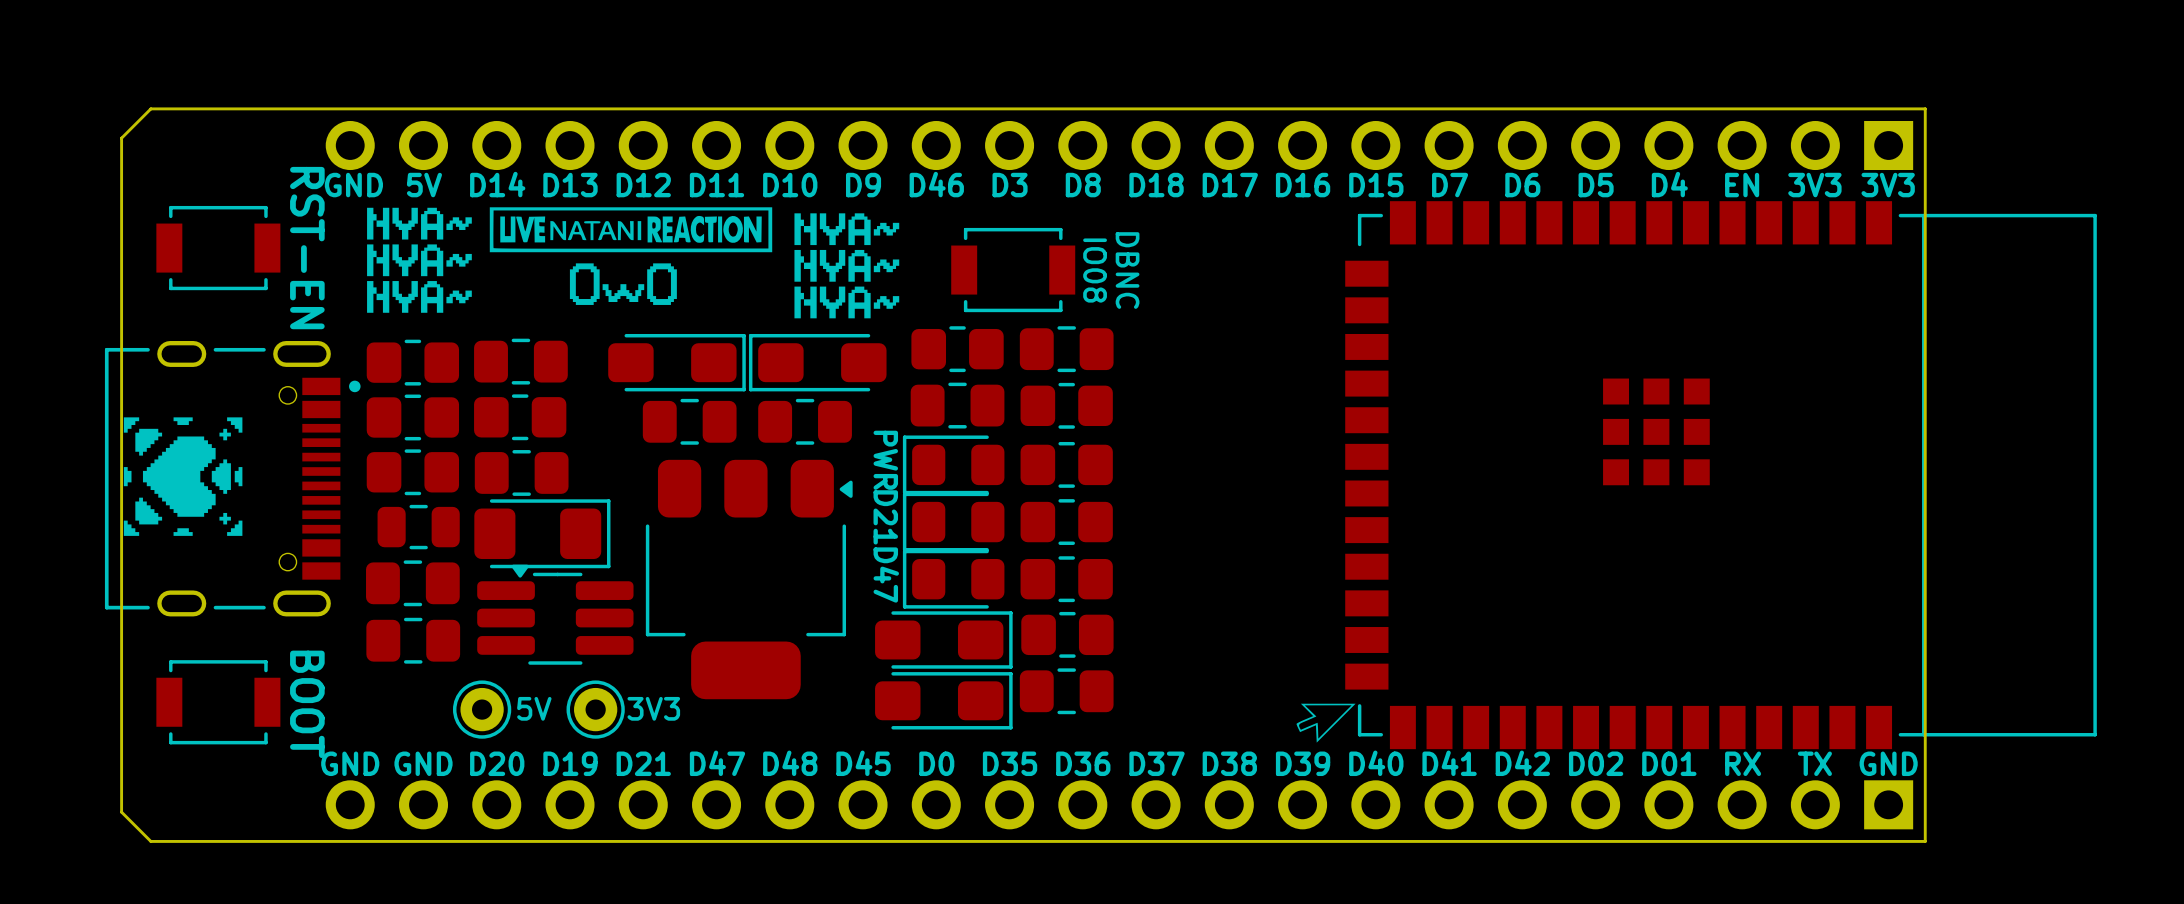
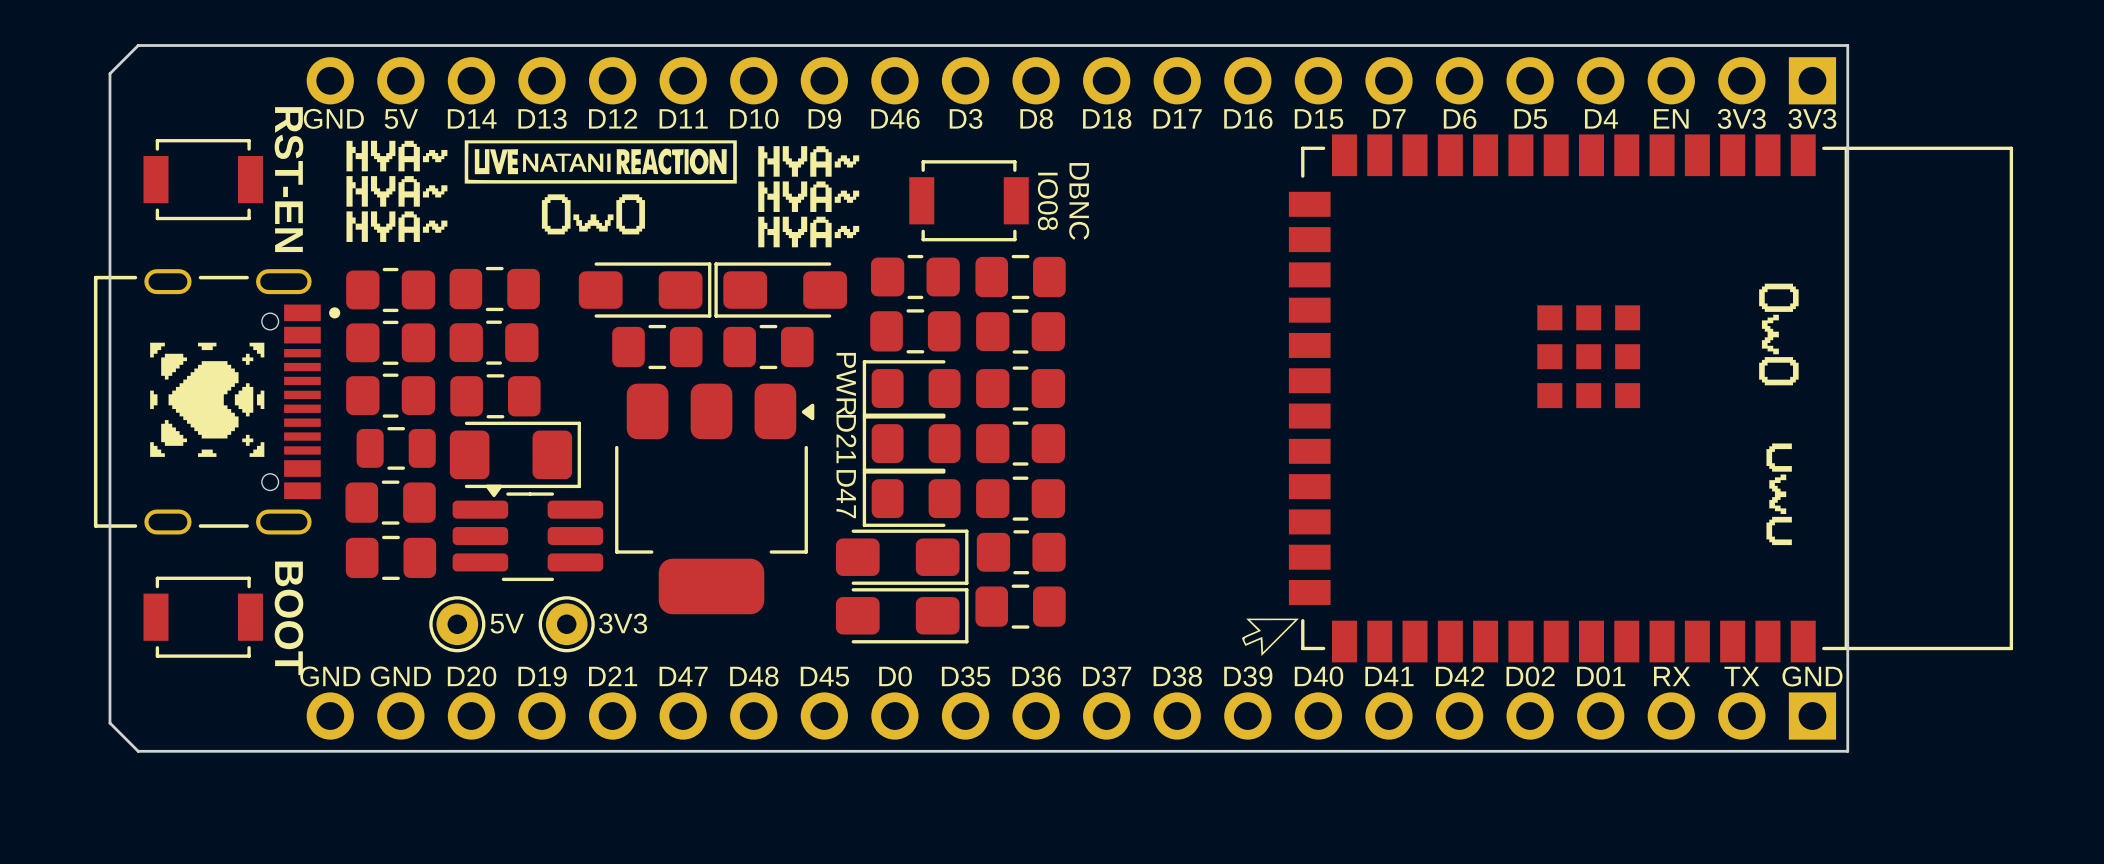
drawing: none -> [1759, 283, 1799, 386]
drawing position: (183, 476) -> (207, 399)
drawing: none -> [1766, 443, 1792, 546]

